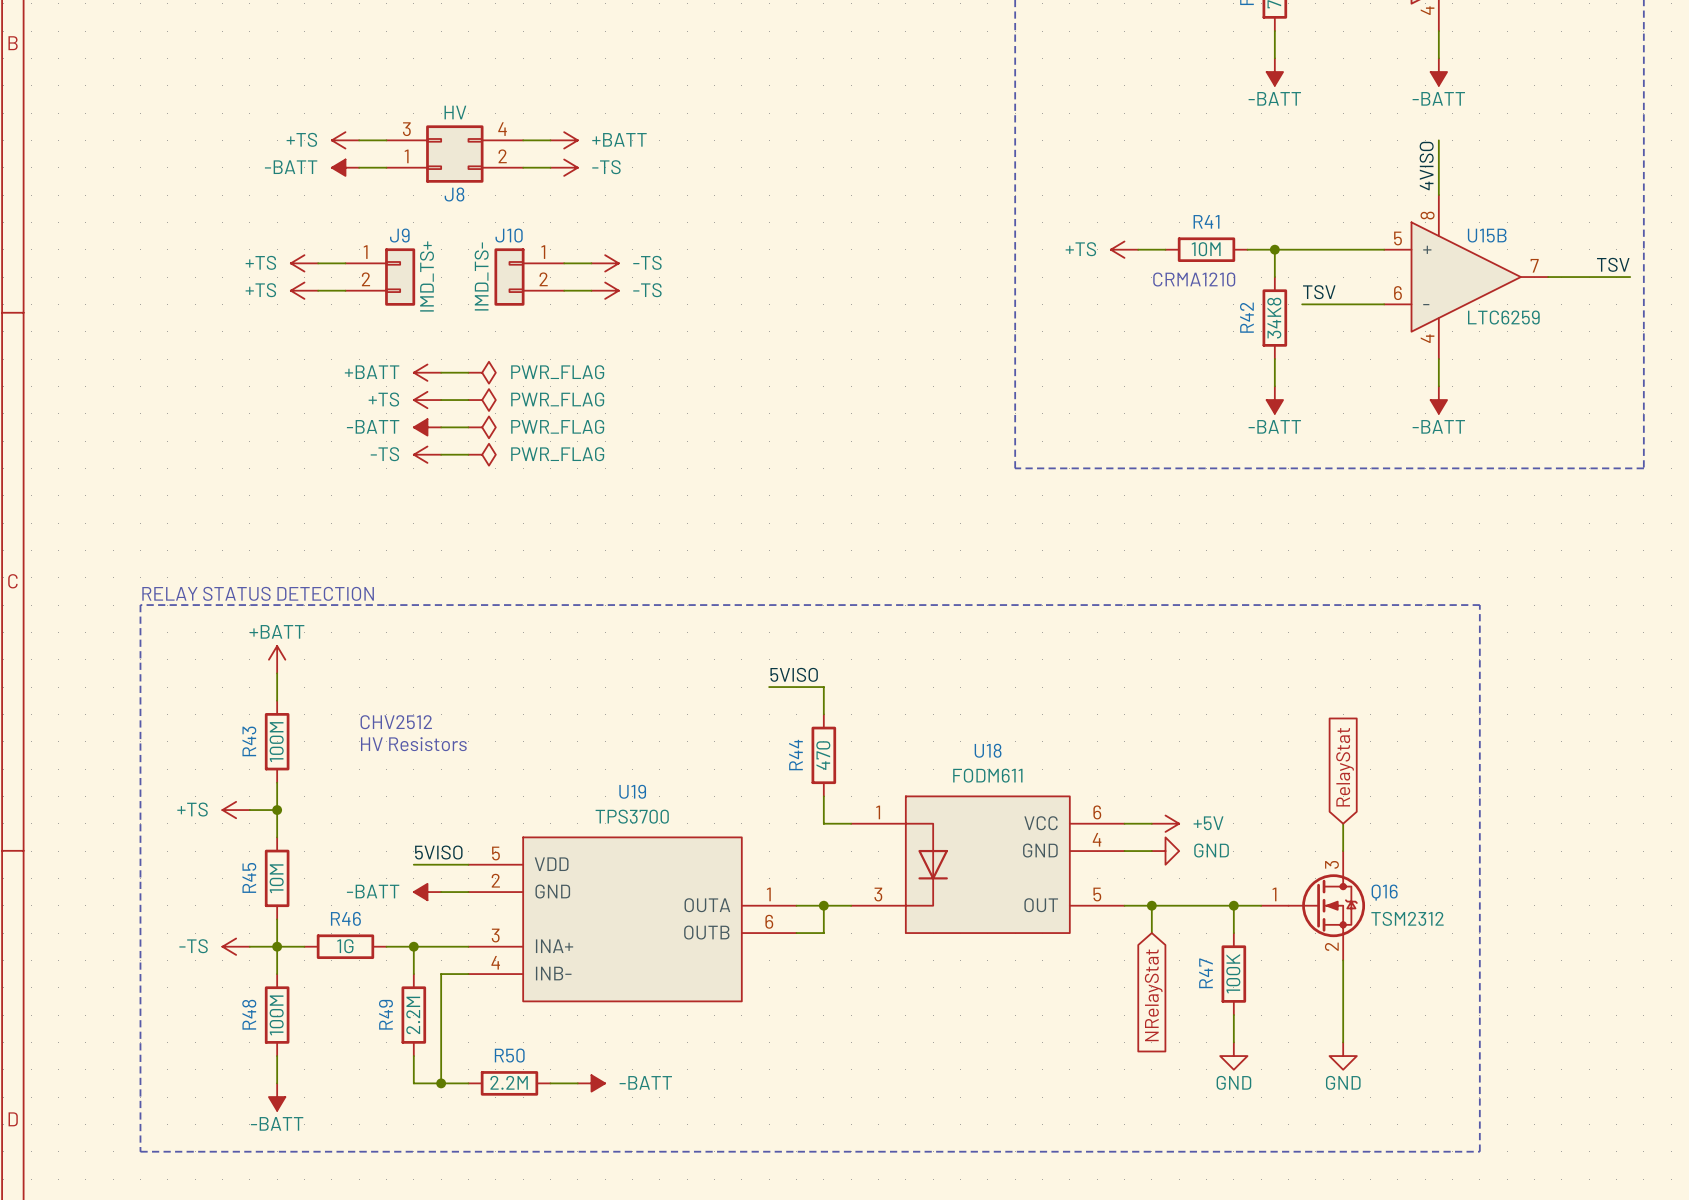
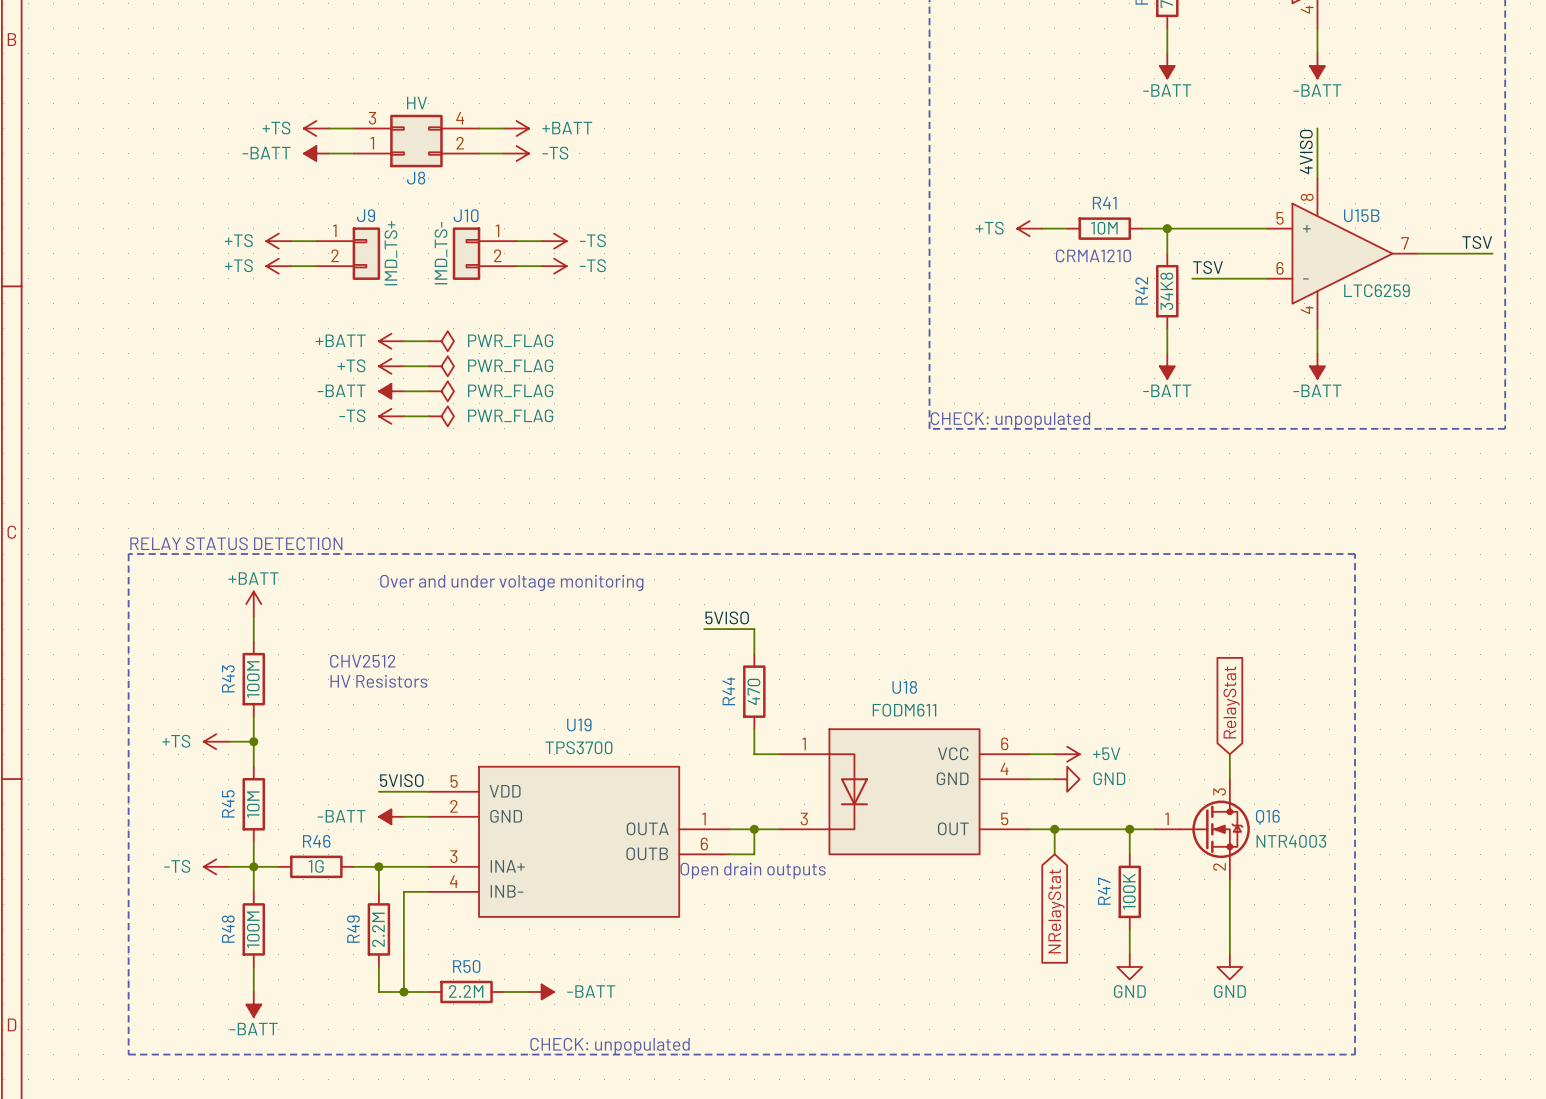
text: none -> CHECK: unpopulated (1010, 420)
text: none -> Over and under voltage monitoring (511, 582)
Q16 value: TSM2312 (1407, 918) -> NTR4003 (1291, 841)
text: none -> Open drain outputs (753, 870)
text: none -> CHECK: unpopulated (610, 1045)

